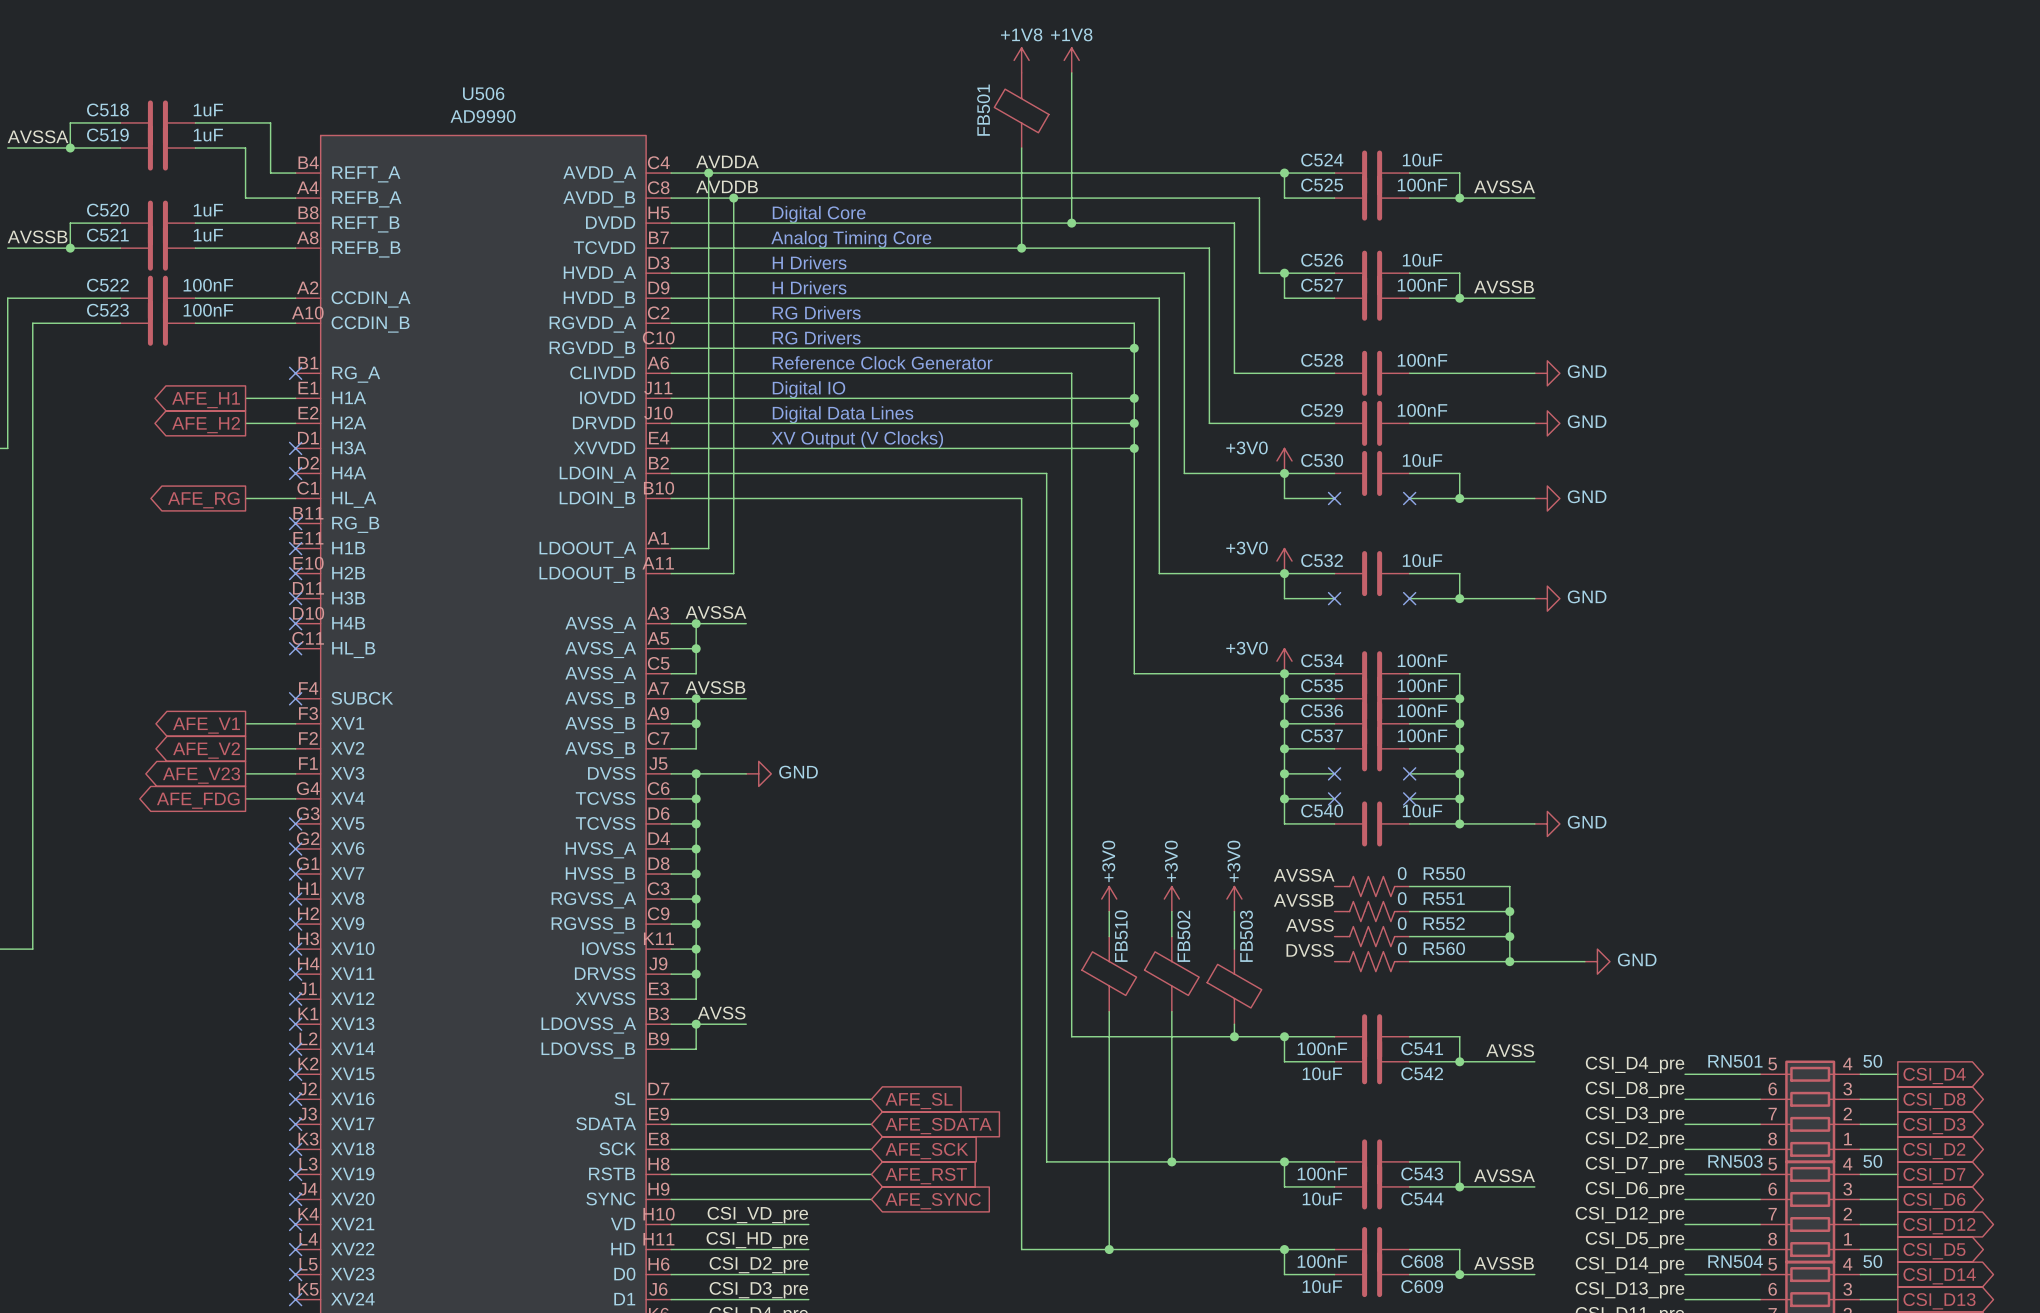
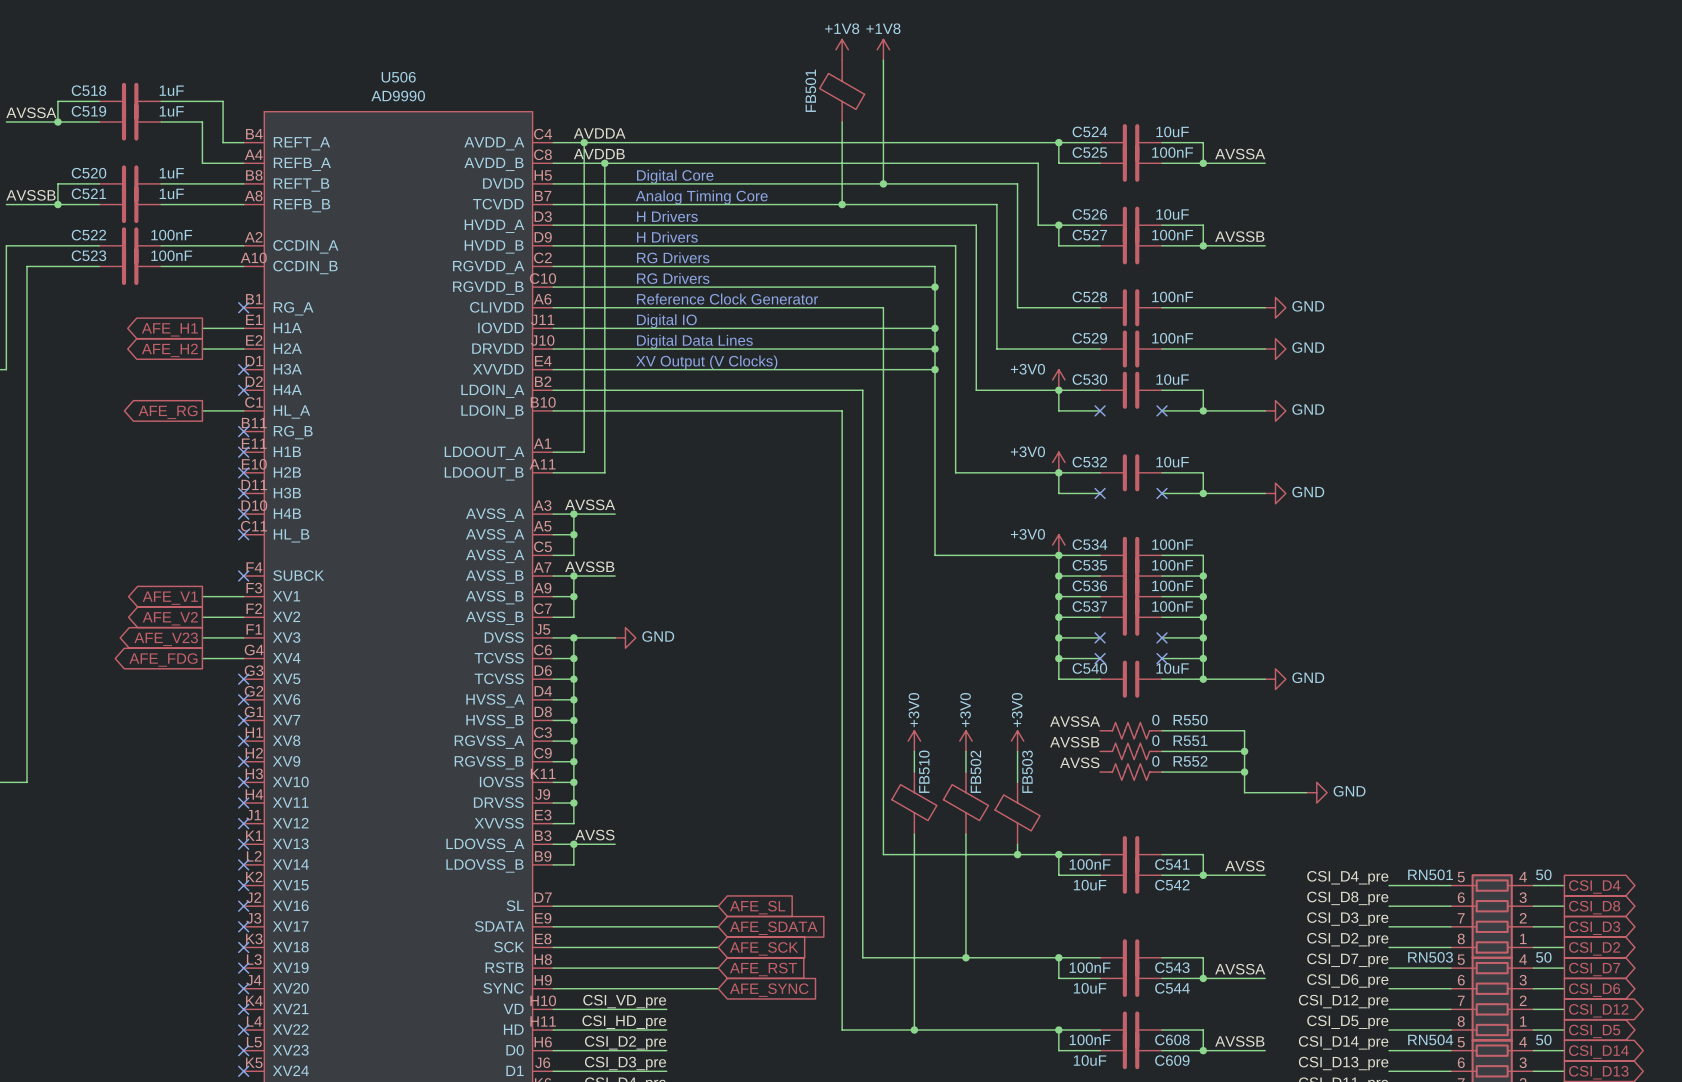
label: DVSS (1310, 950) -> none
R560: 0 (1372, 961) -> none
wire: (1409, 961) (1509, 961) -> none
junction: (1509, 961) -> none

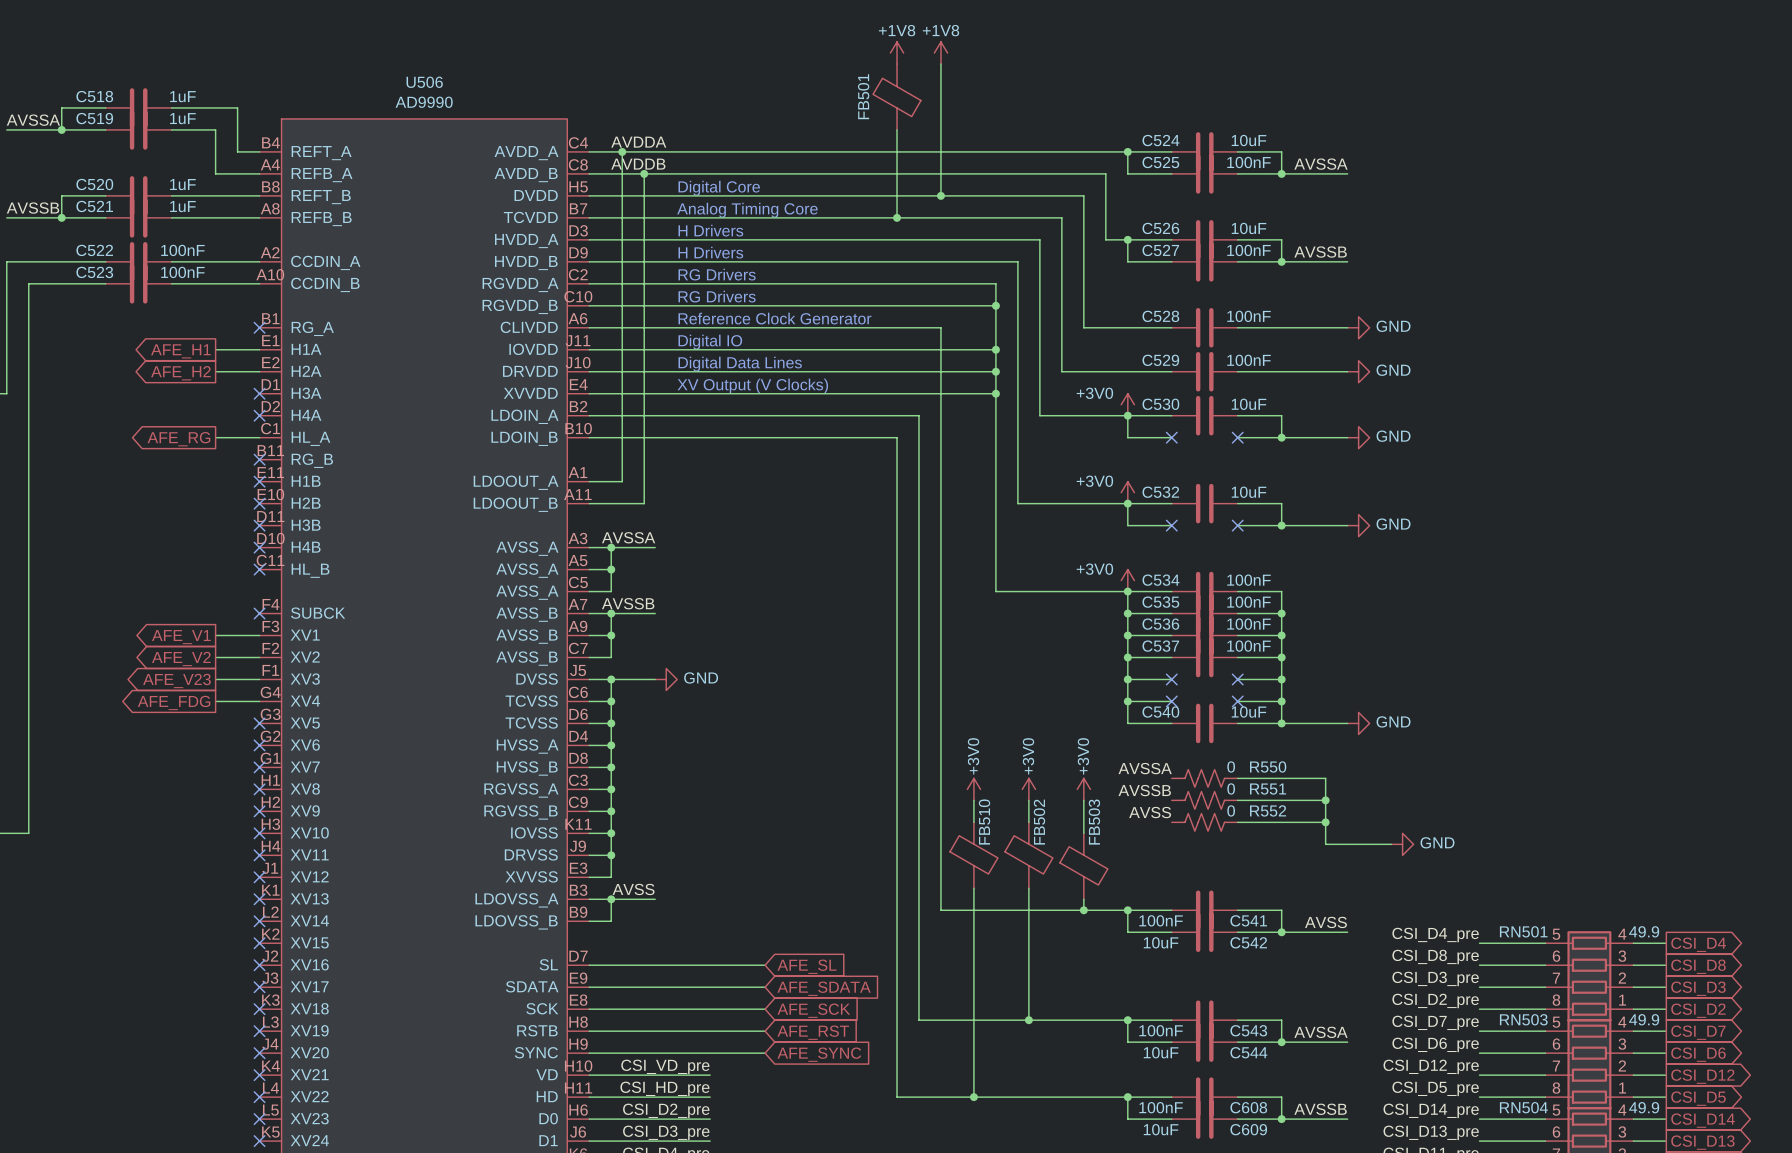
RN501 value: 50 (1543, 874) -> 49.9 (1644, 931)
RN503 value: 50 (1543, 957) -> 49.9 (1644, 1019)
RN504 value: 50 (1543, 1039) -> 49.9 (1644, 1107)

